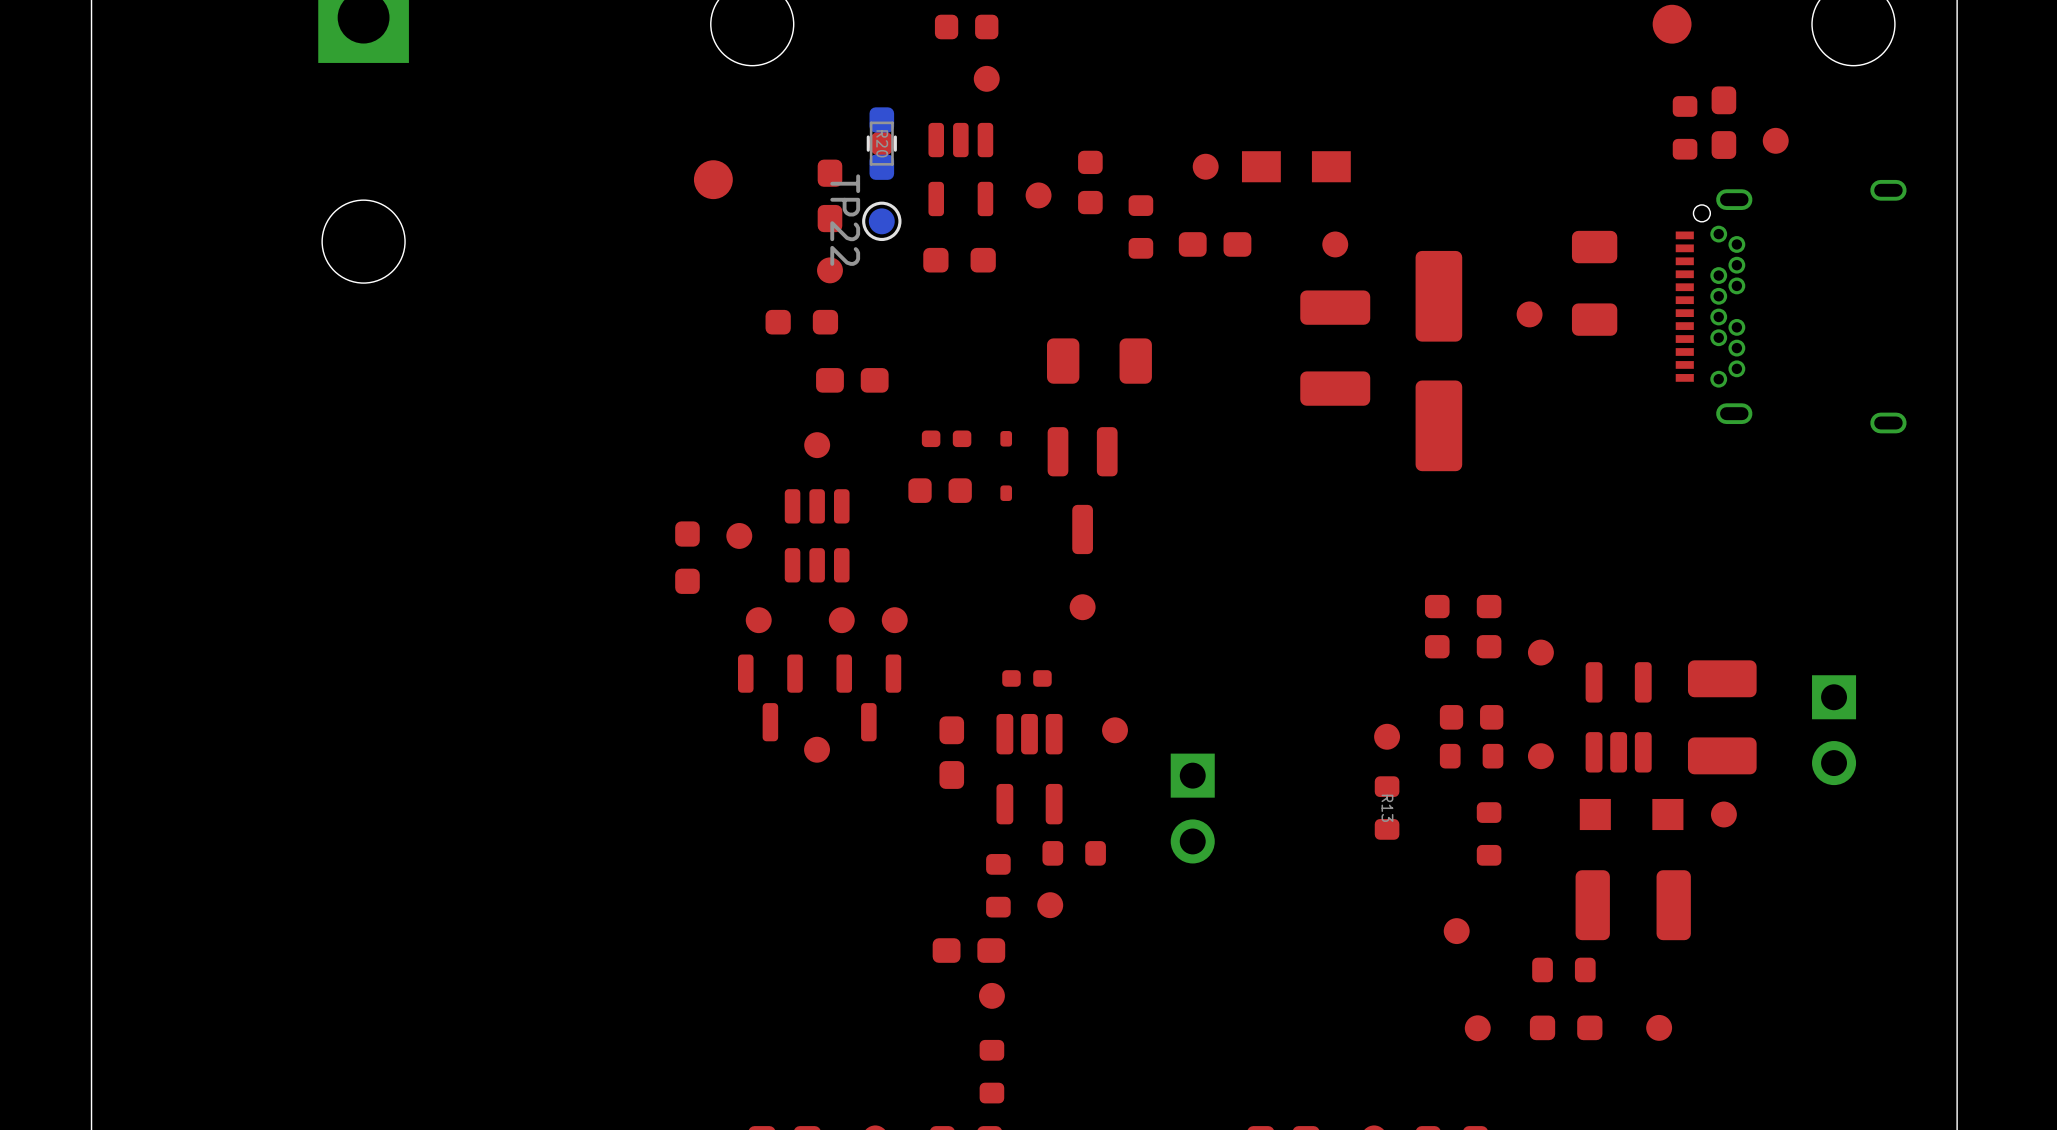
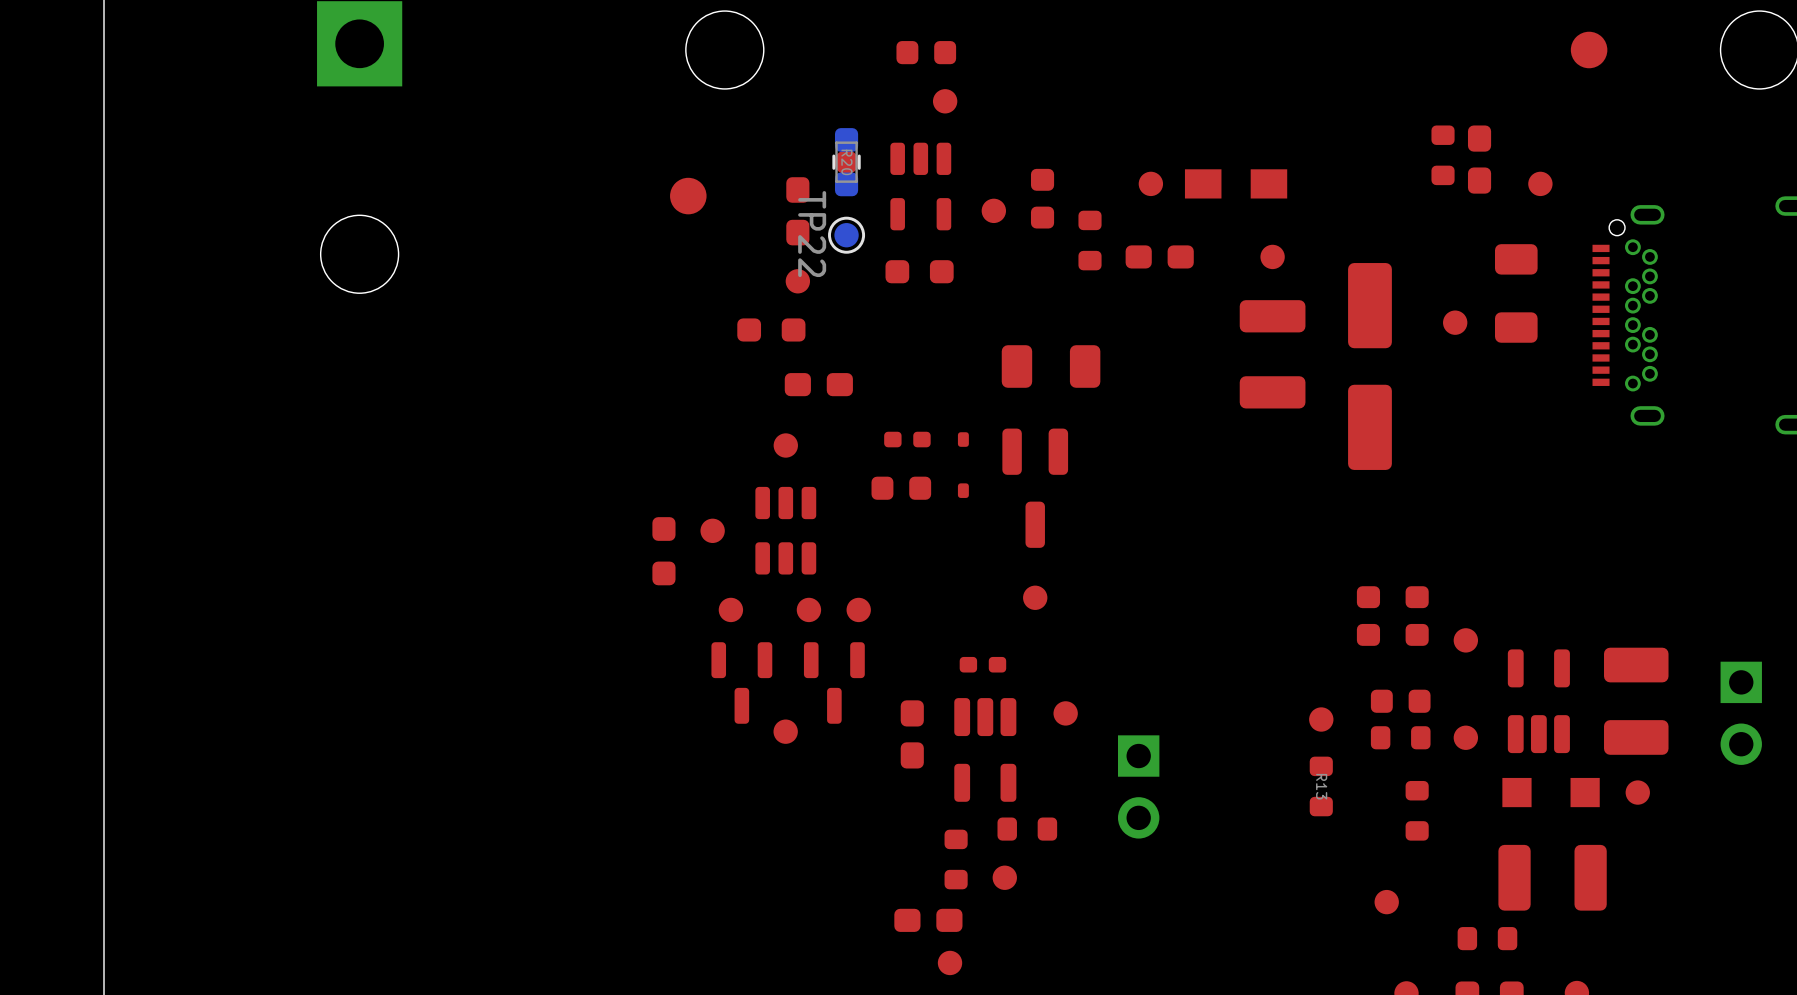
part position: (1723, 122) -> (1479, 159)
part position: (1685, 127) -> (1443, 155)
part position: (1775, 140) -> (1540, 183)

